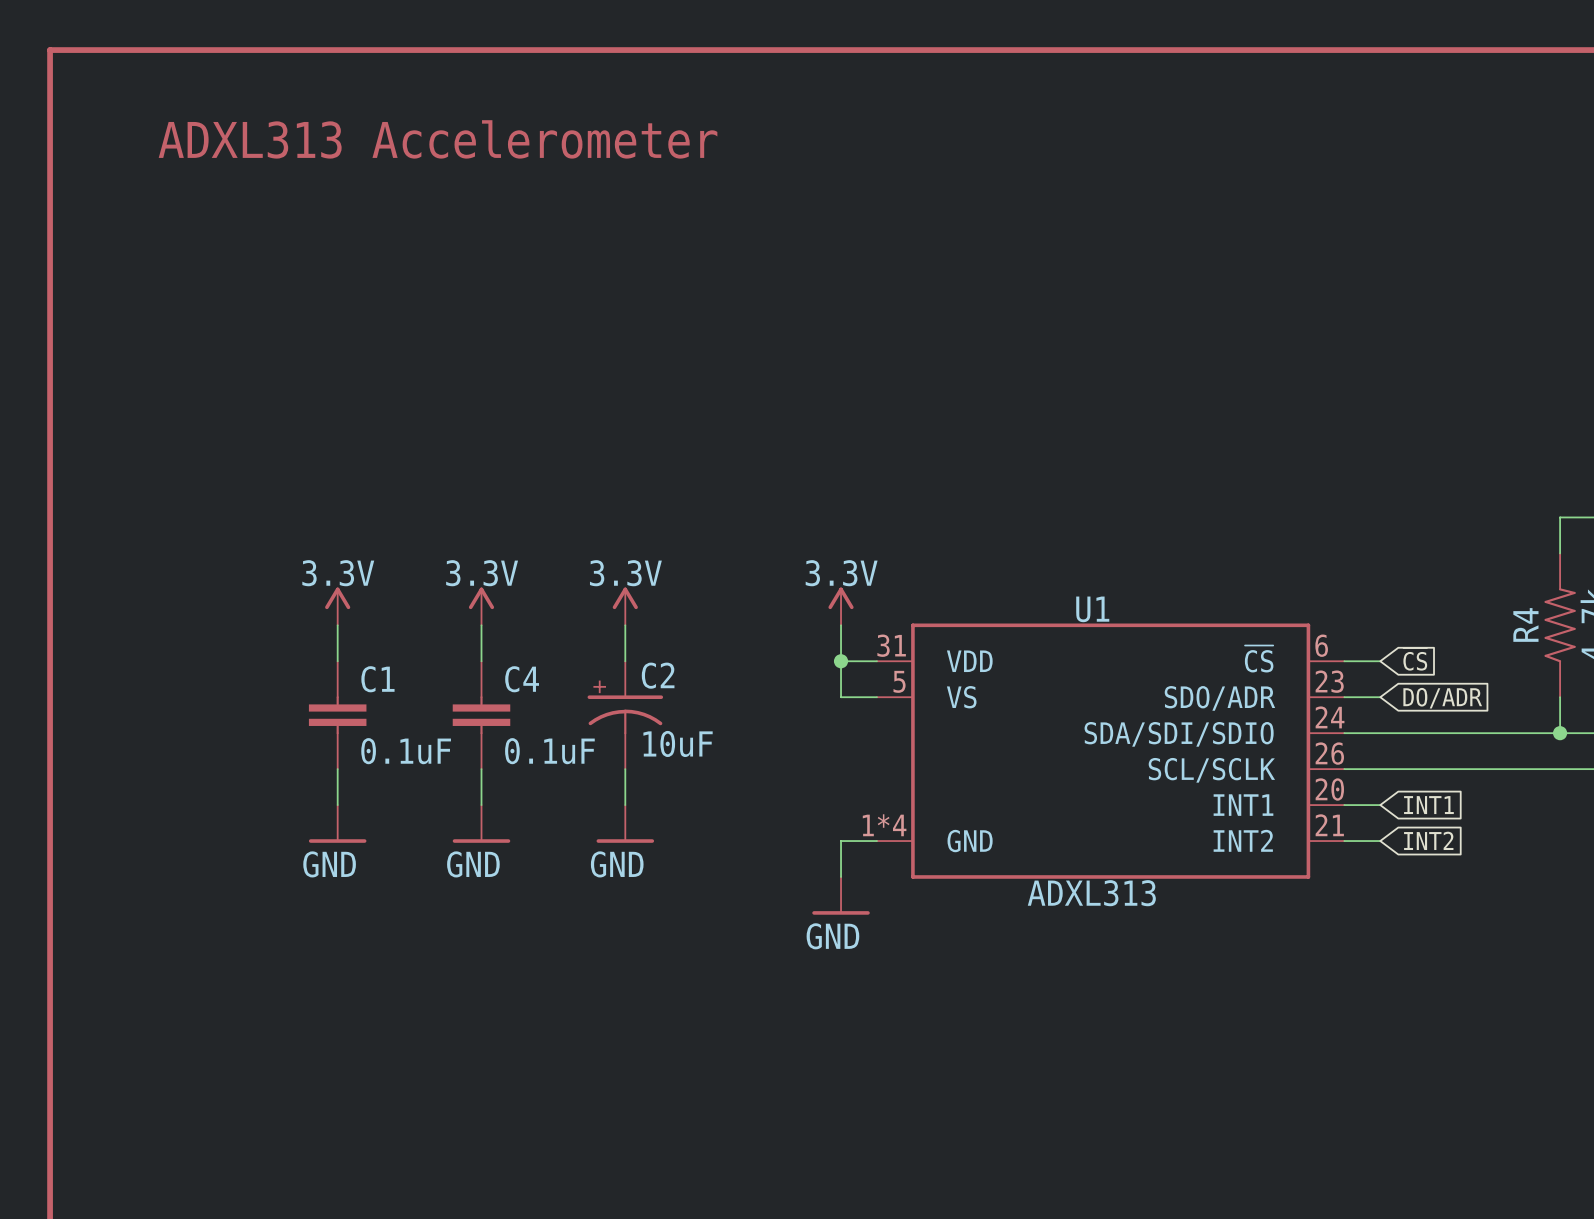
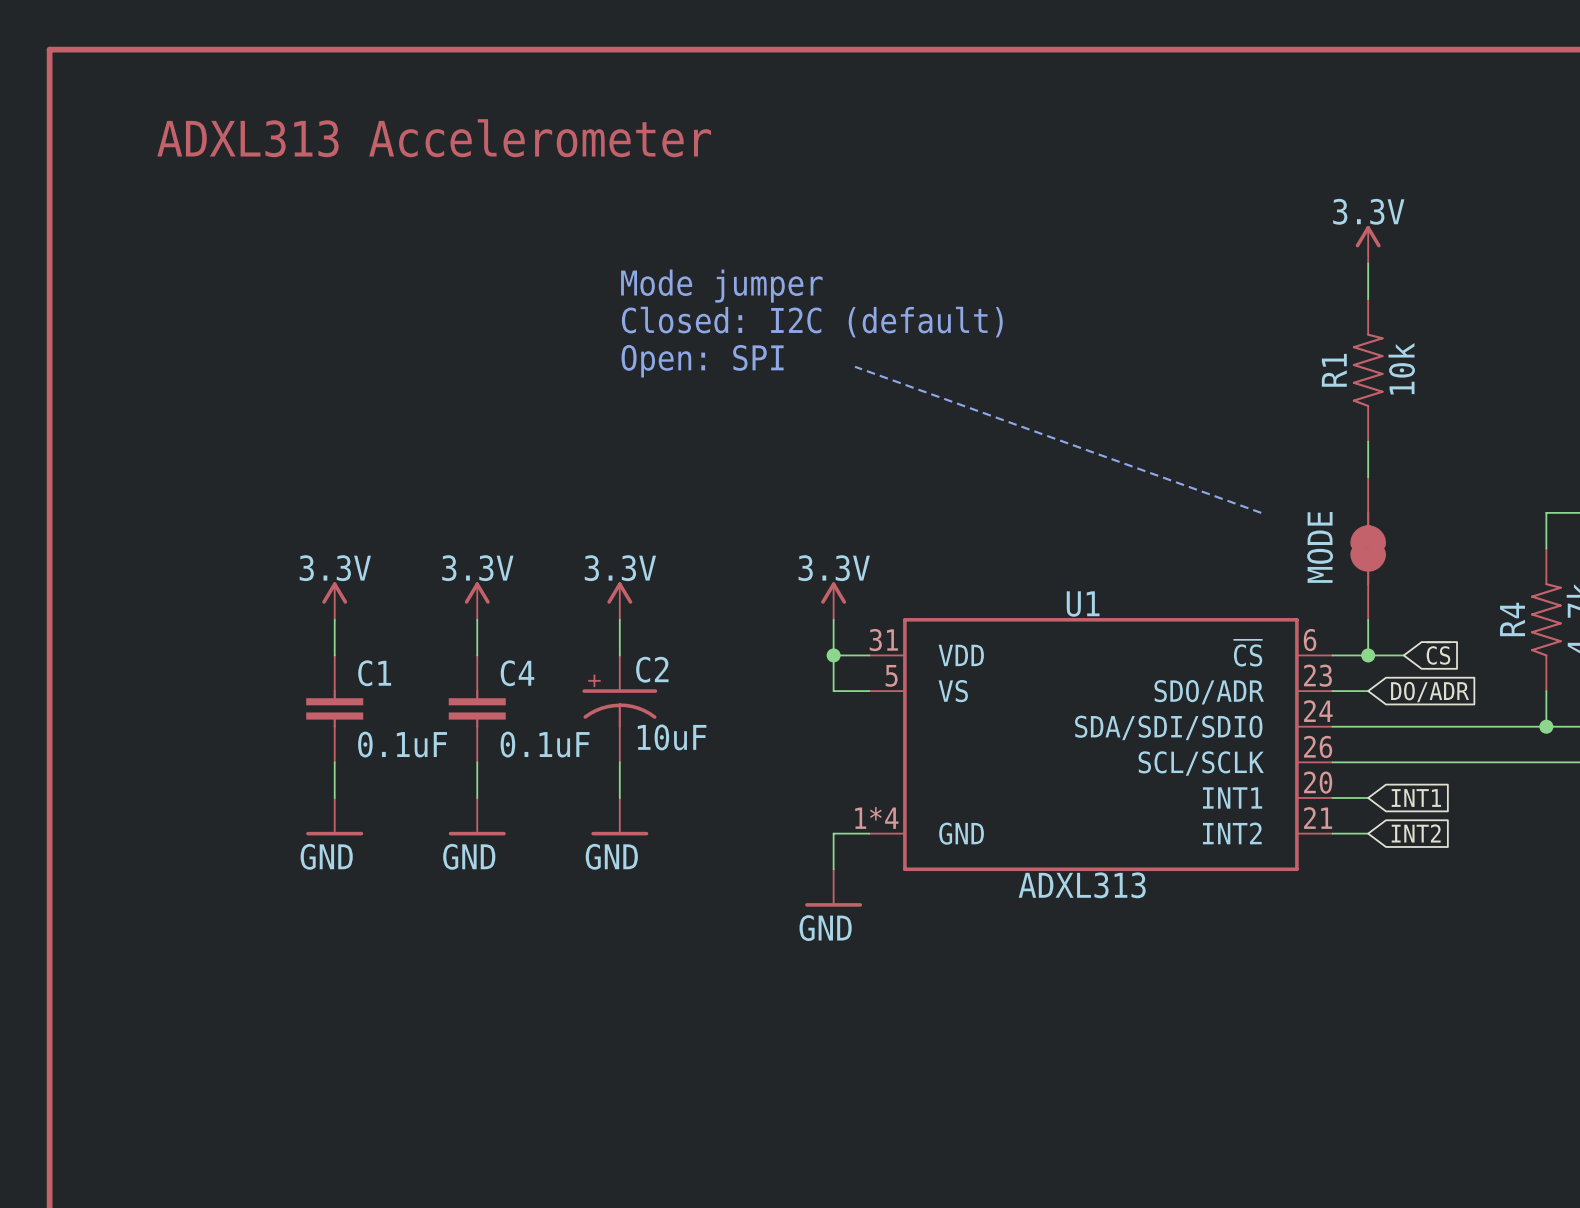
power symbol: none -> 3.3V (1368, 244)
wire: none -> (1368, 263) (1368, 299)
text: none -> Mode jumper (721, 286)
text: none -> Closed: I2C (default) (812, 322)
text: none -> Open: SPI (702, 361)
line: none -> (855, 366) (1261, 512)
R1: none -> 10k (1368, 370)
wire: none -> (1368, 441) (1368, 477)
MODE: none -> (1368, 548)
wire: none -> (1368, 619) (1368, 655) (1403, 655)
global label position: ~{CS} (1415, 659) -> ~{CS} (1438, 653)
junction: none -> (1368, 655)

